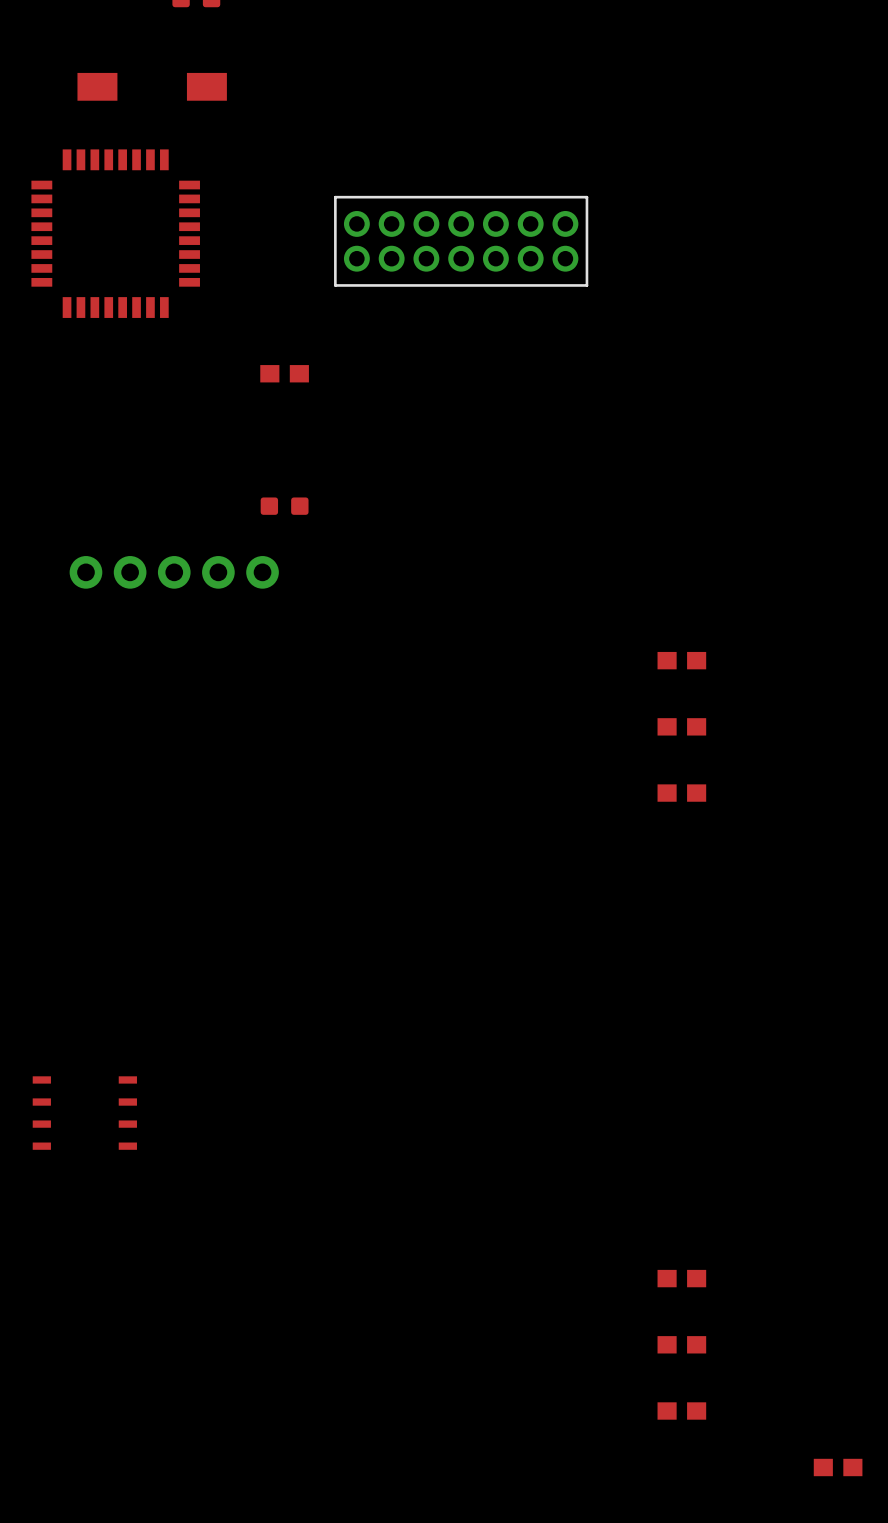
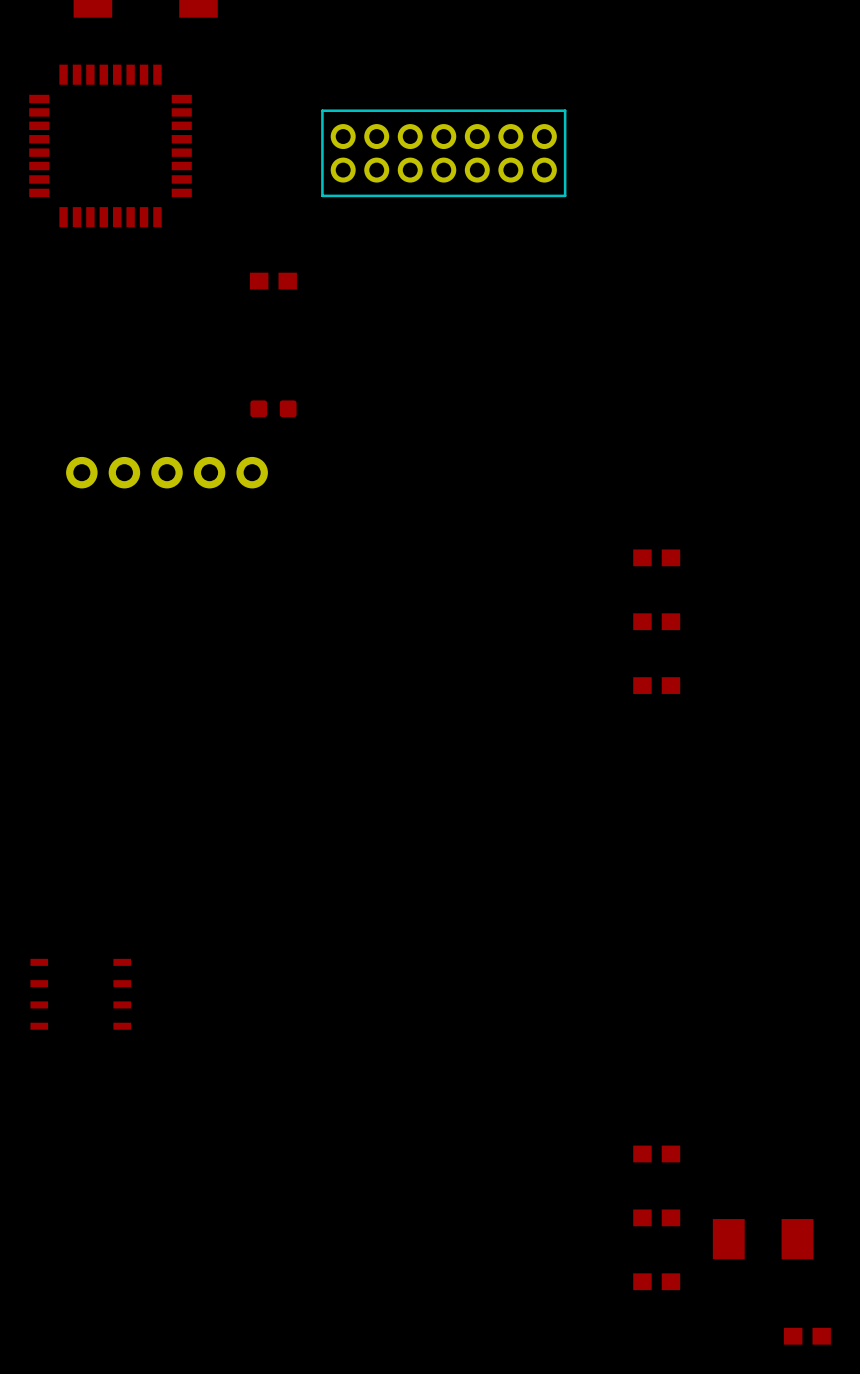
part: none -> (763, 1239)

